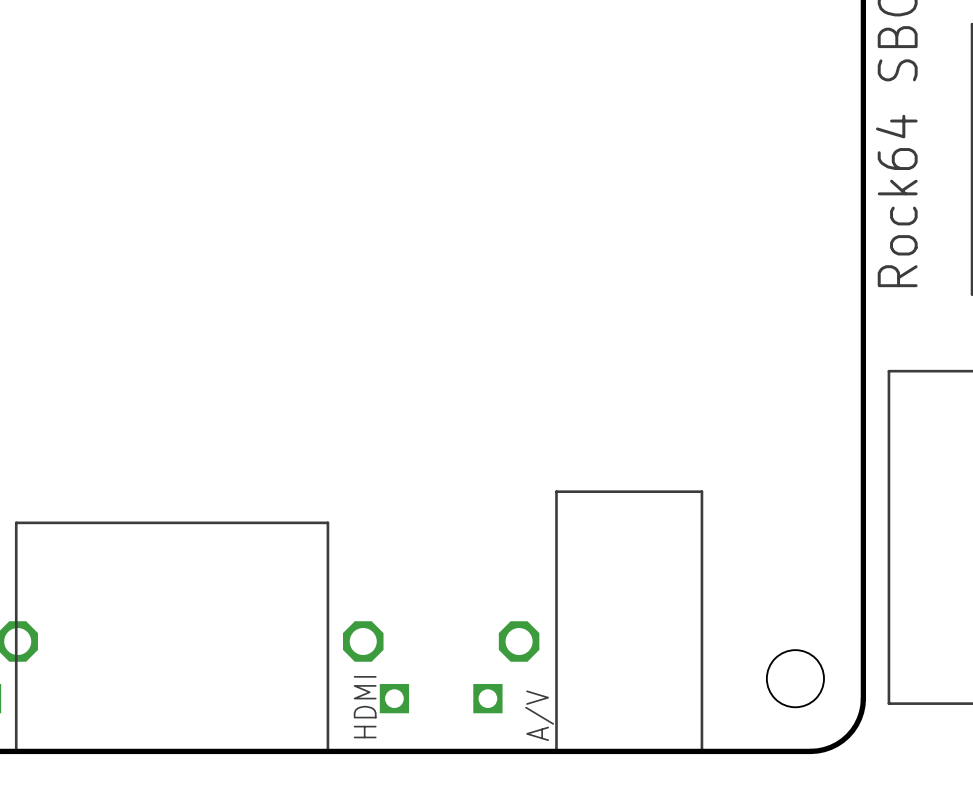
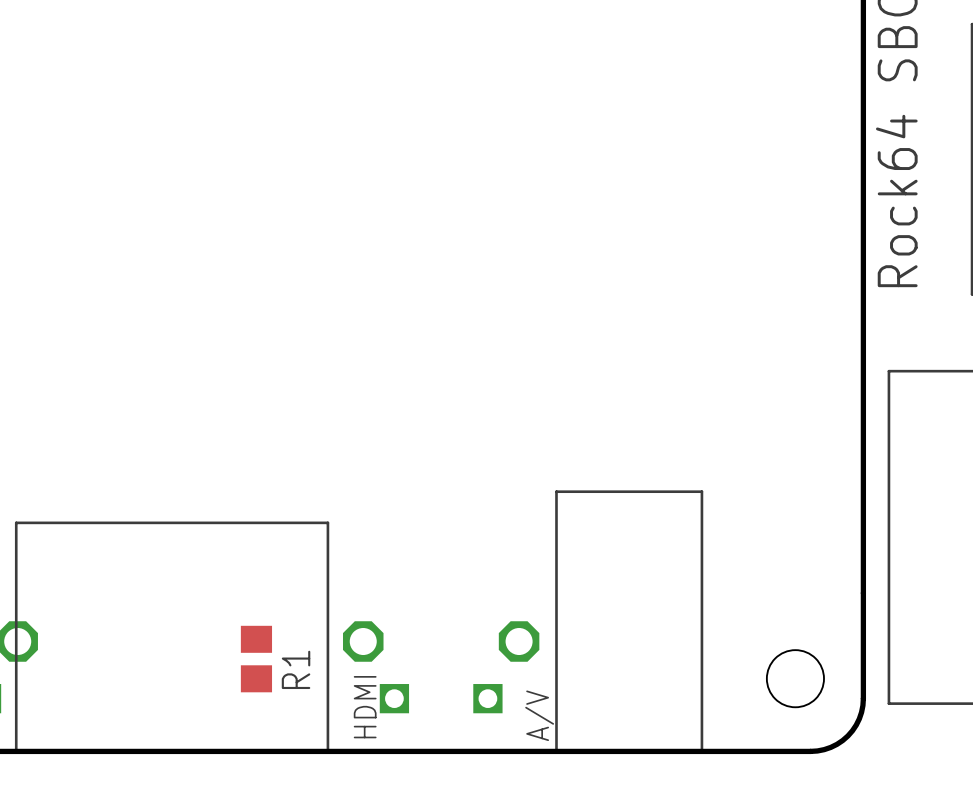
R1: none -> (256, 659)

